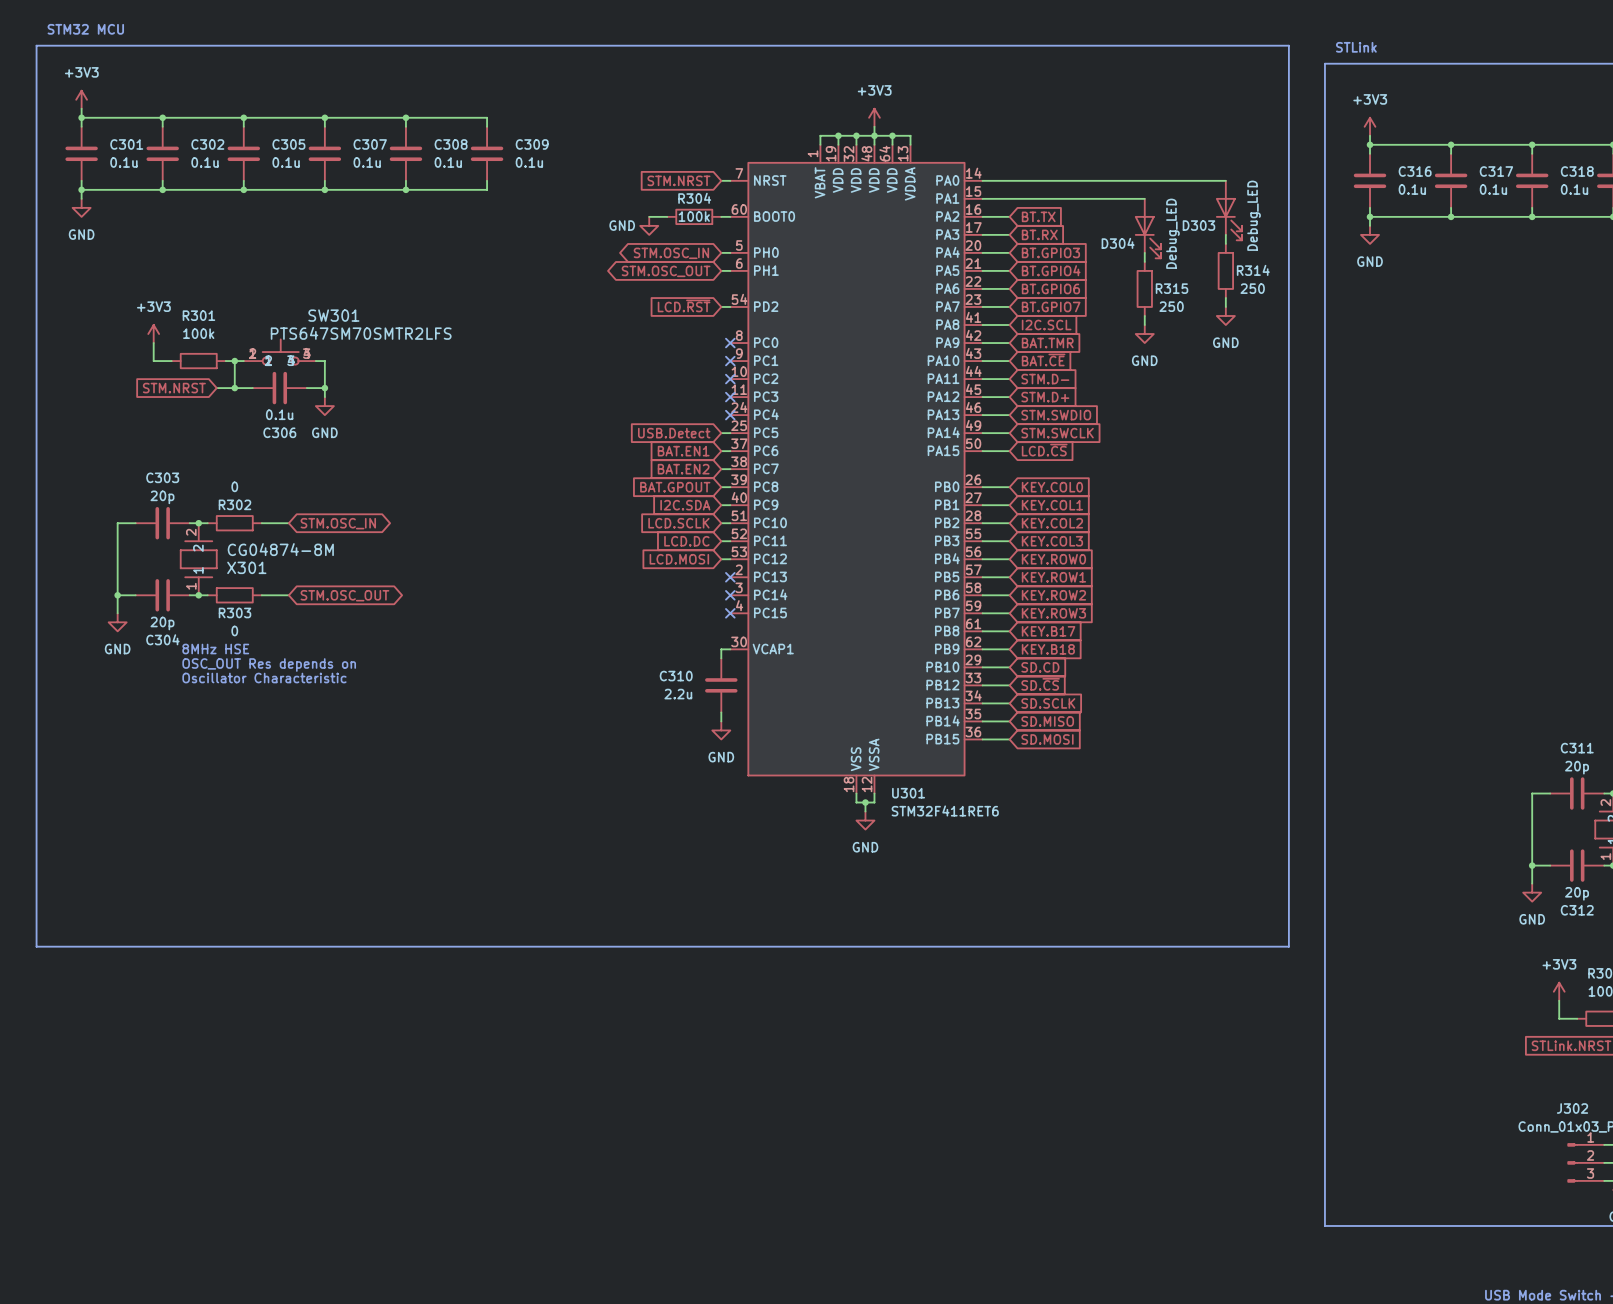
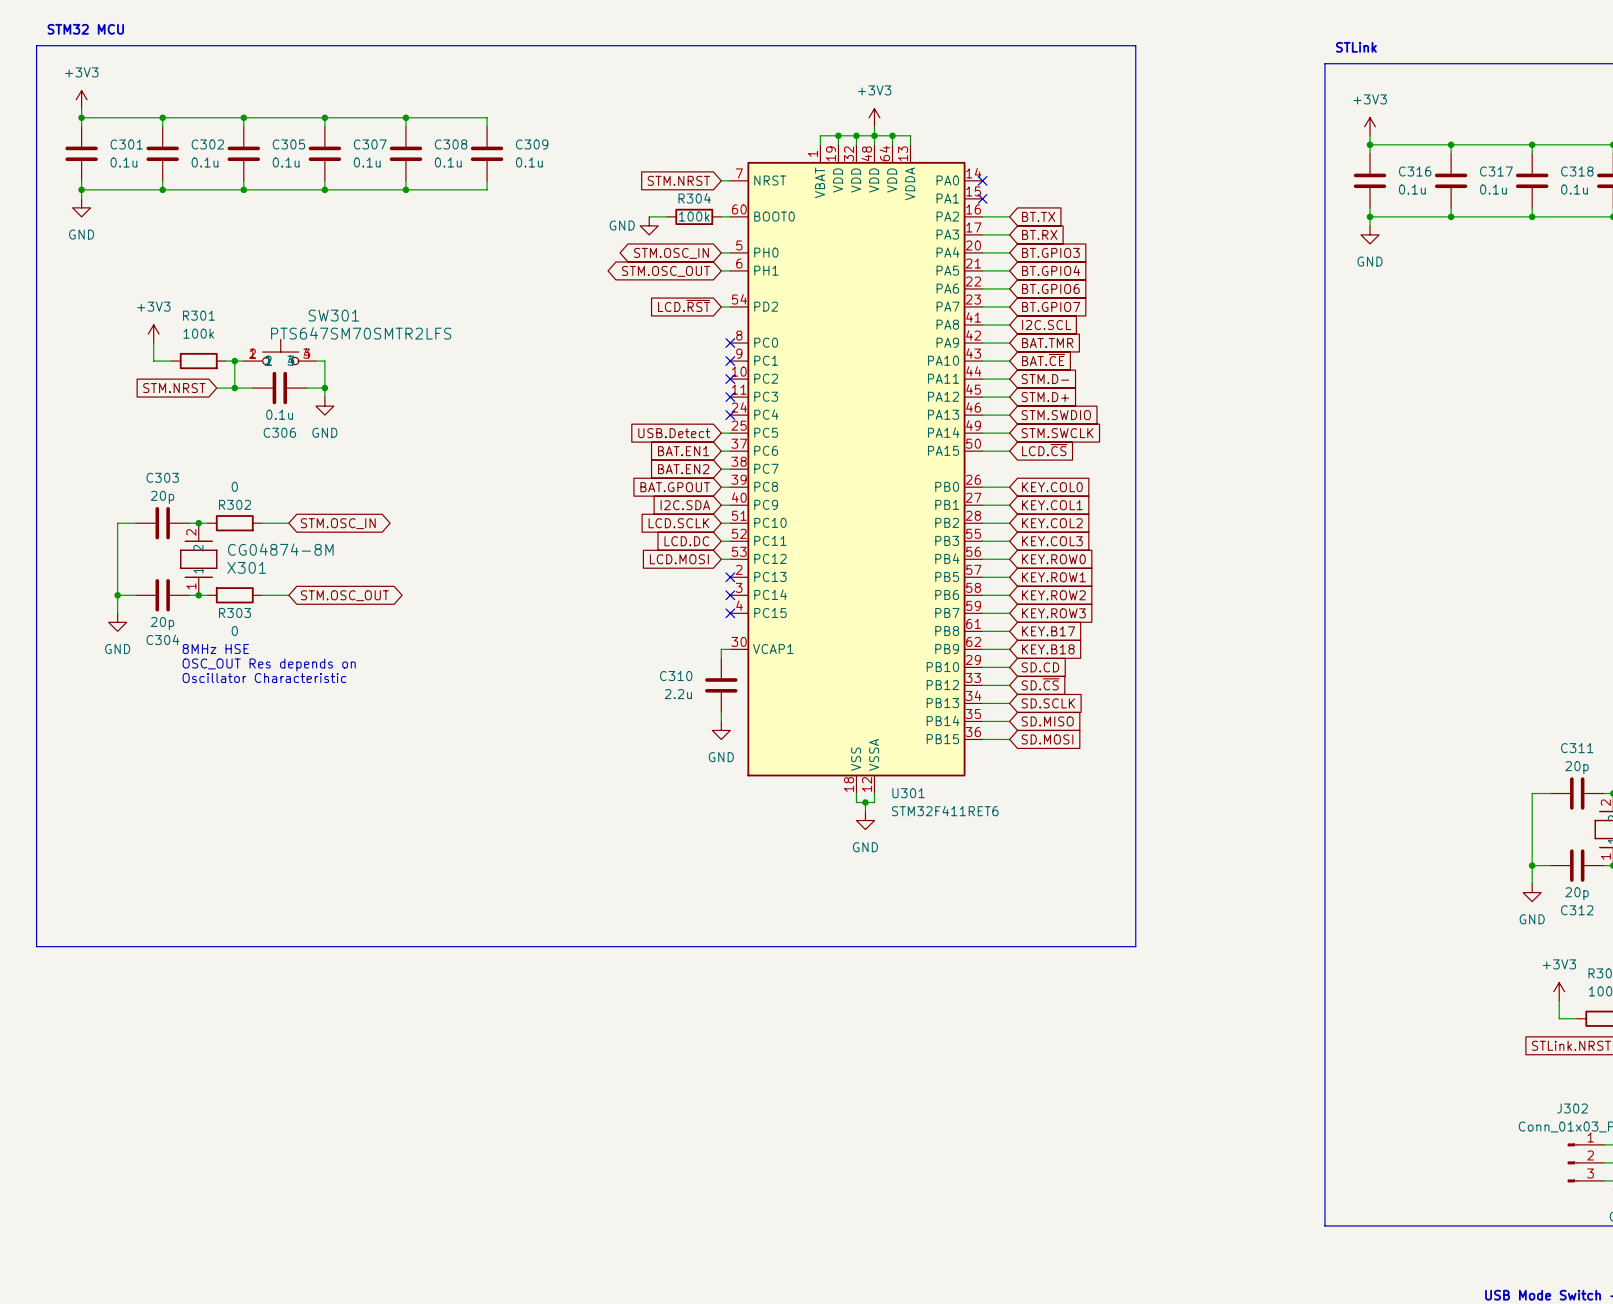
line: (1135, 45) (1288, 45) (1288, 946) (1135, 946) -> (1135, 45) (1135, 946)
wire: (982, 180) (1225, 180) -> none
no-connect mark: none -> (982, 180)
wire: (982, 198) (1144, 198) -> none
no-connect mark: none -> (982, 198)
D303: Debug_LED (1229, 210) -> none
D304: Debug_LED (1147, 228) -> none
wire: (1225, 234) (1225, 243) -> none
wire: (1144, 252) (1144, 261) -> none
R314: 250 (1225, 270) -> none
R315: 250 (1144, 288) -> none
wire: (1225, 297) (1225, 306) -> none
wire: (1144, 315) (1144, 325) -> none
power symbol: GND (1225, 315) -> none
power symbol: GND (1144, 334) -> none

